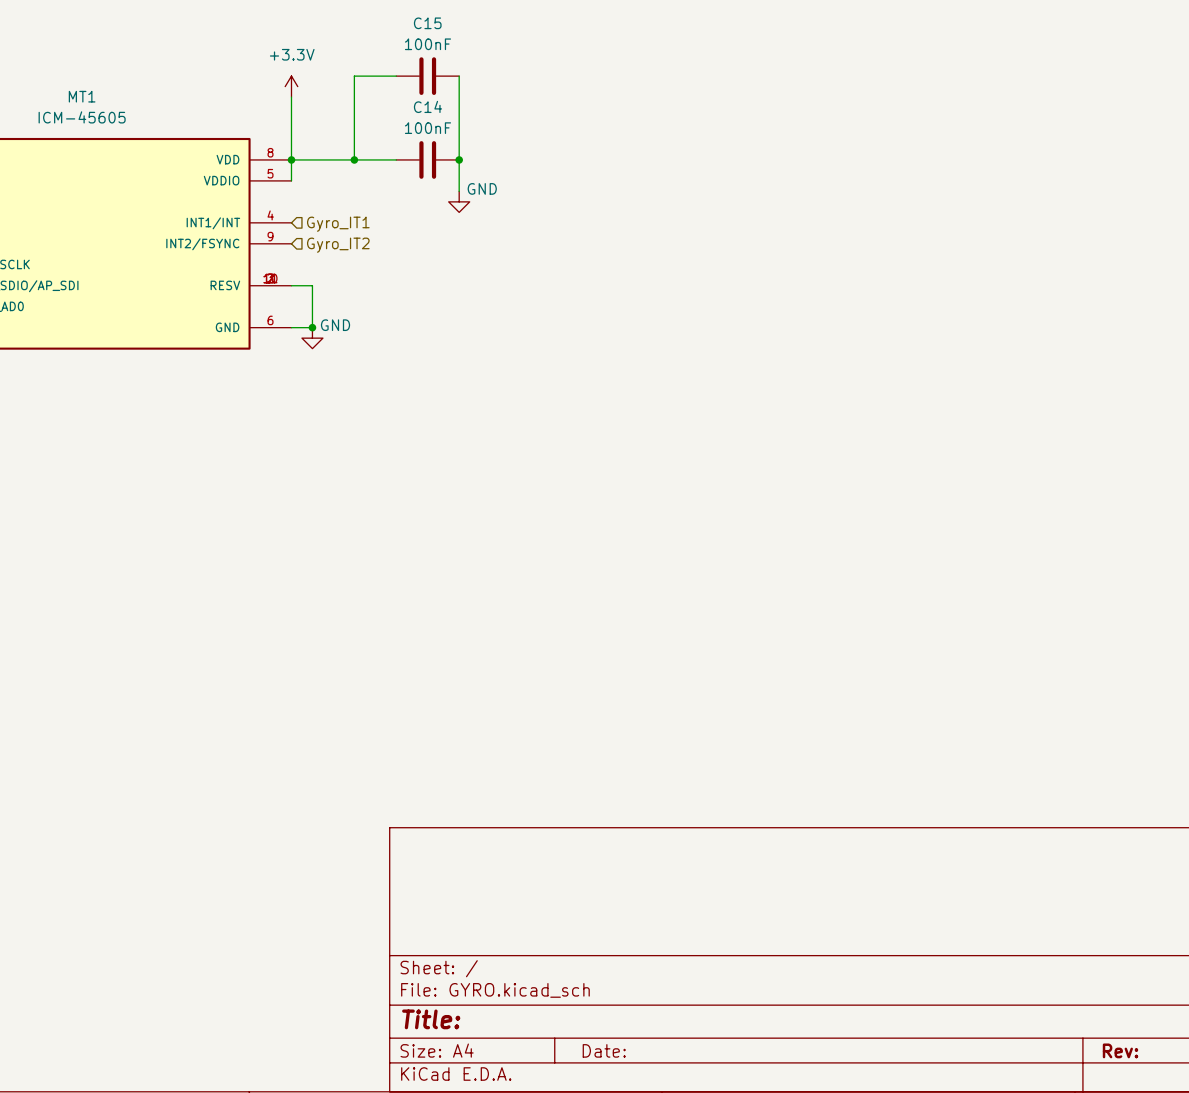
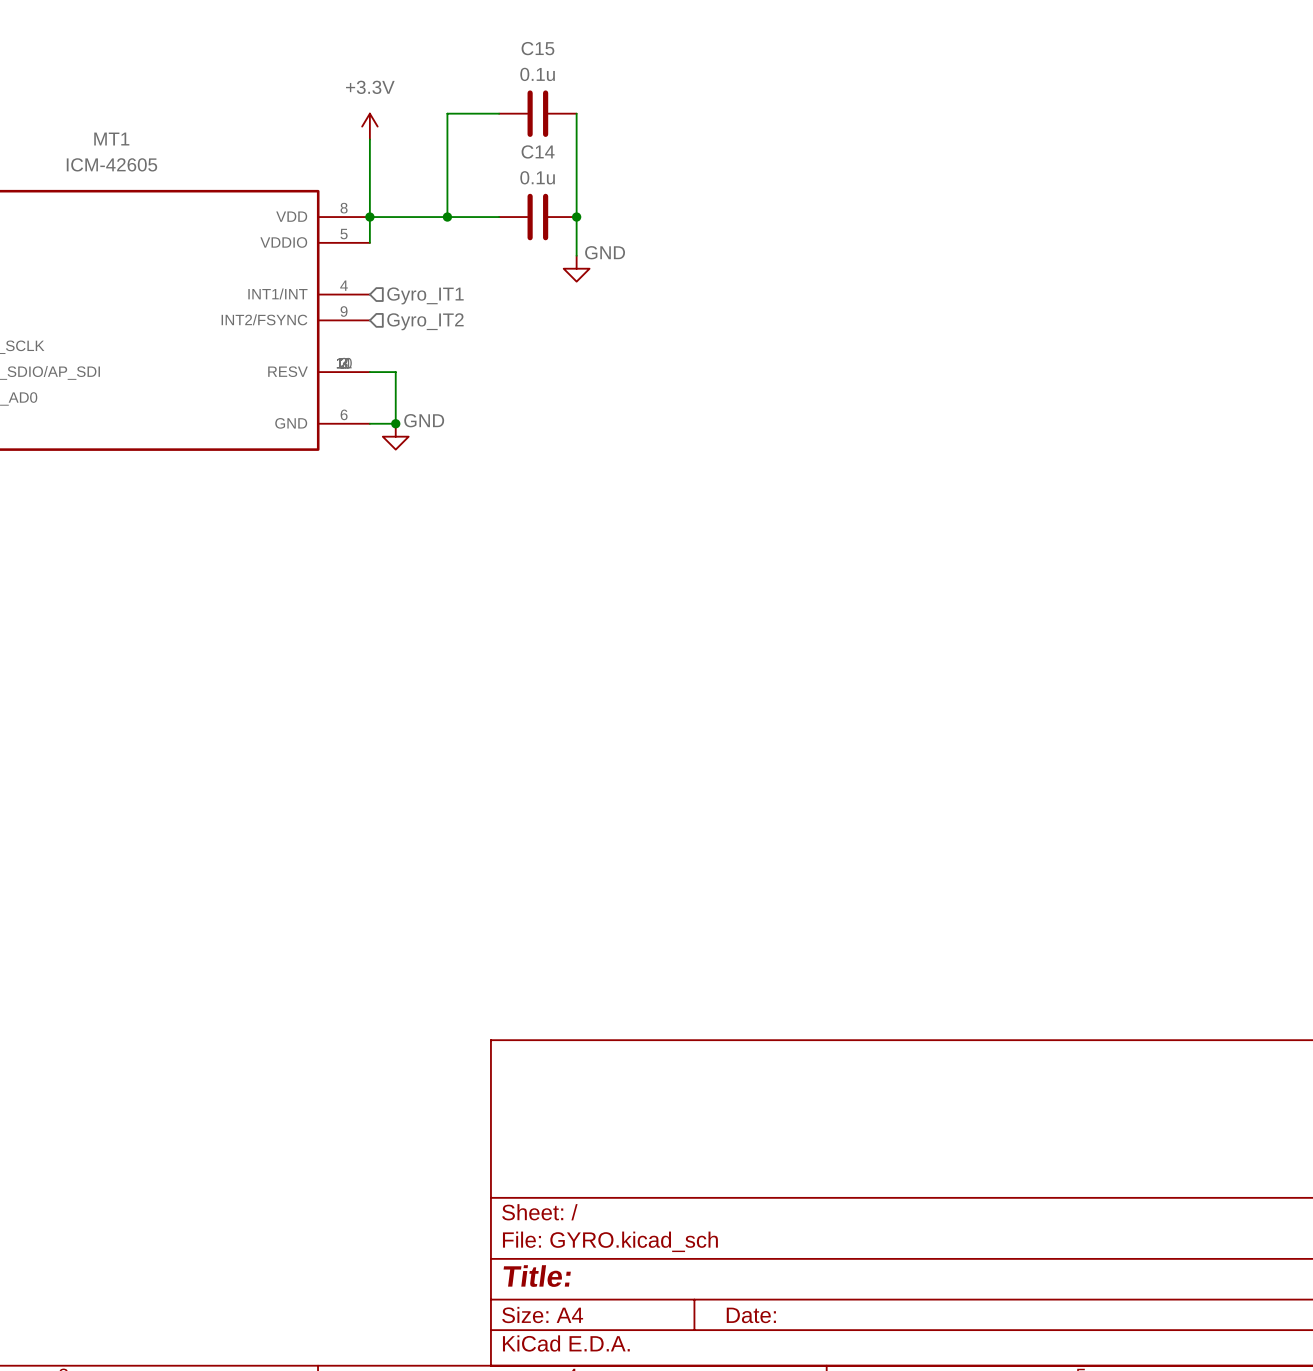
C15 value: 100nF (427, 44) -> 0.1u (537, 74)
MT1 value: ICM-45605 (82, 117) -> ICM-42605 (111, 164)
C14 value: 100nF (427, 128) -> 0.1u (537, 177)

